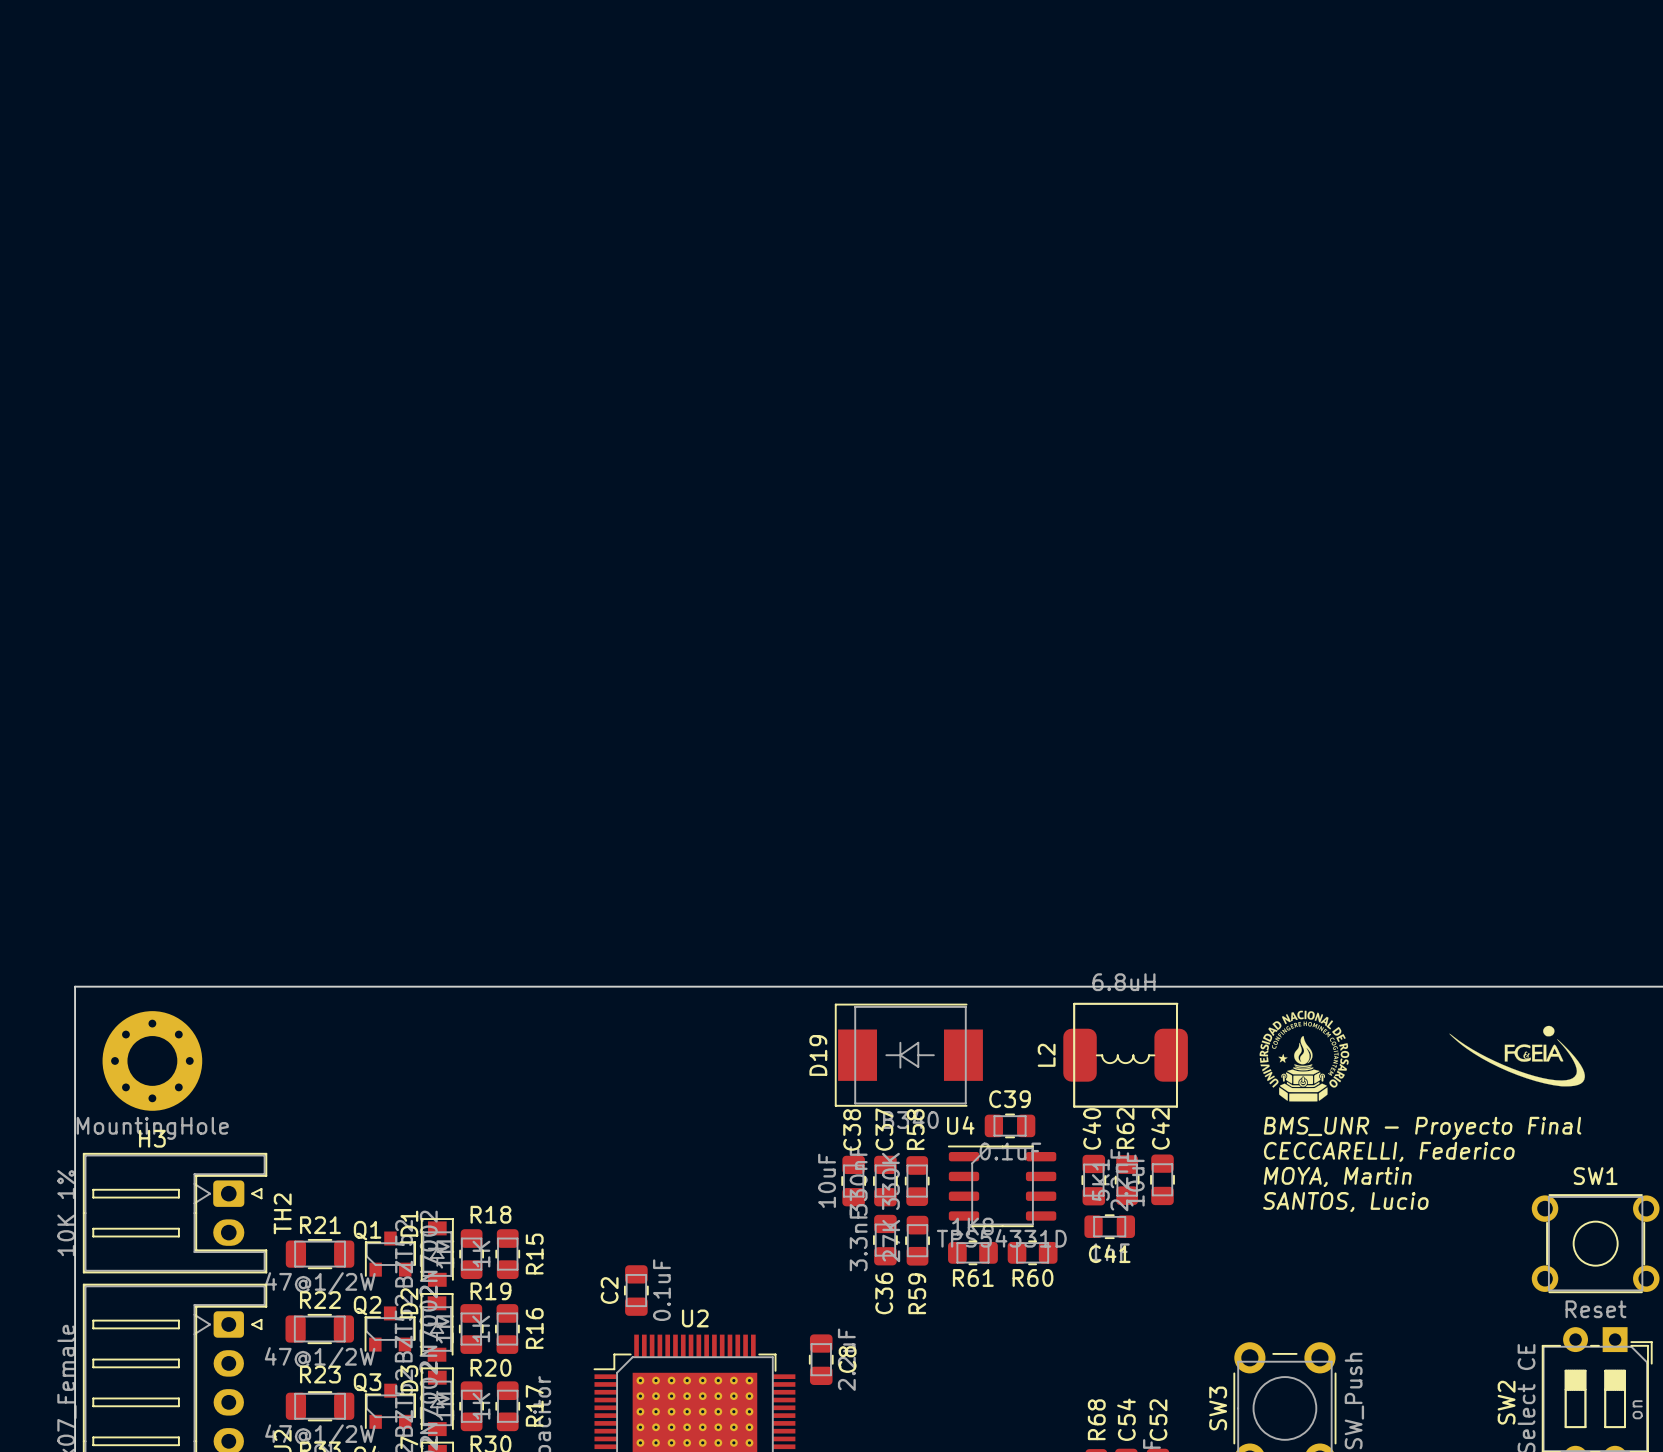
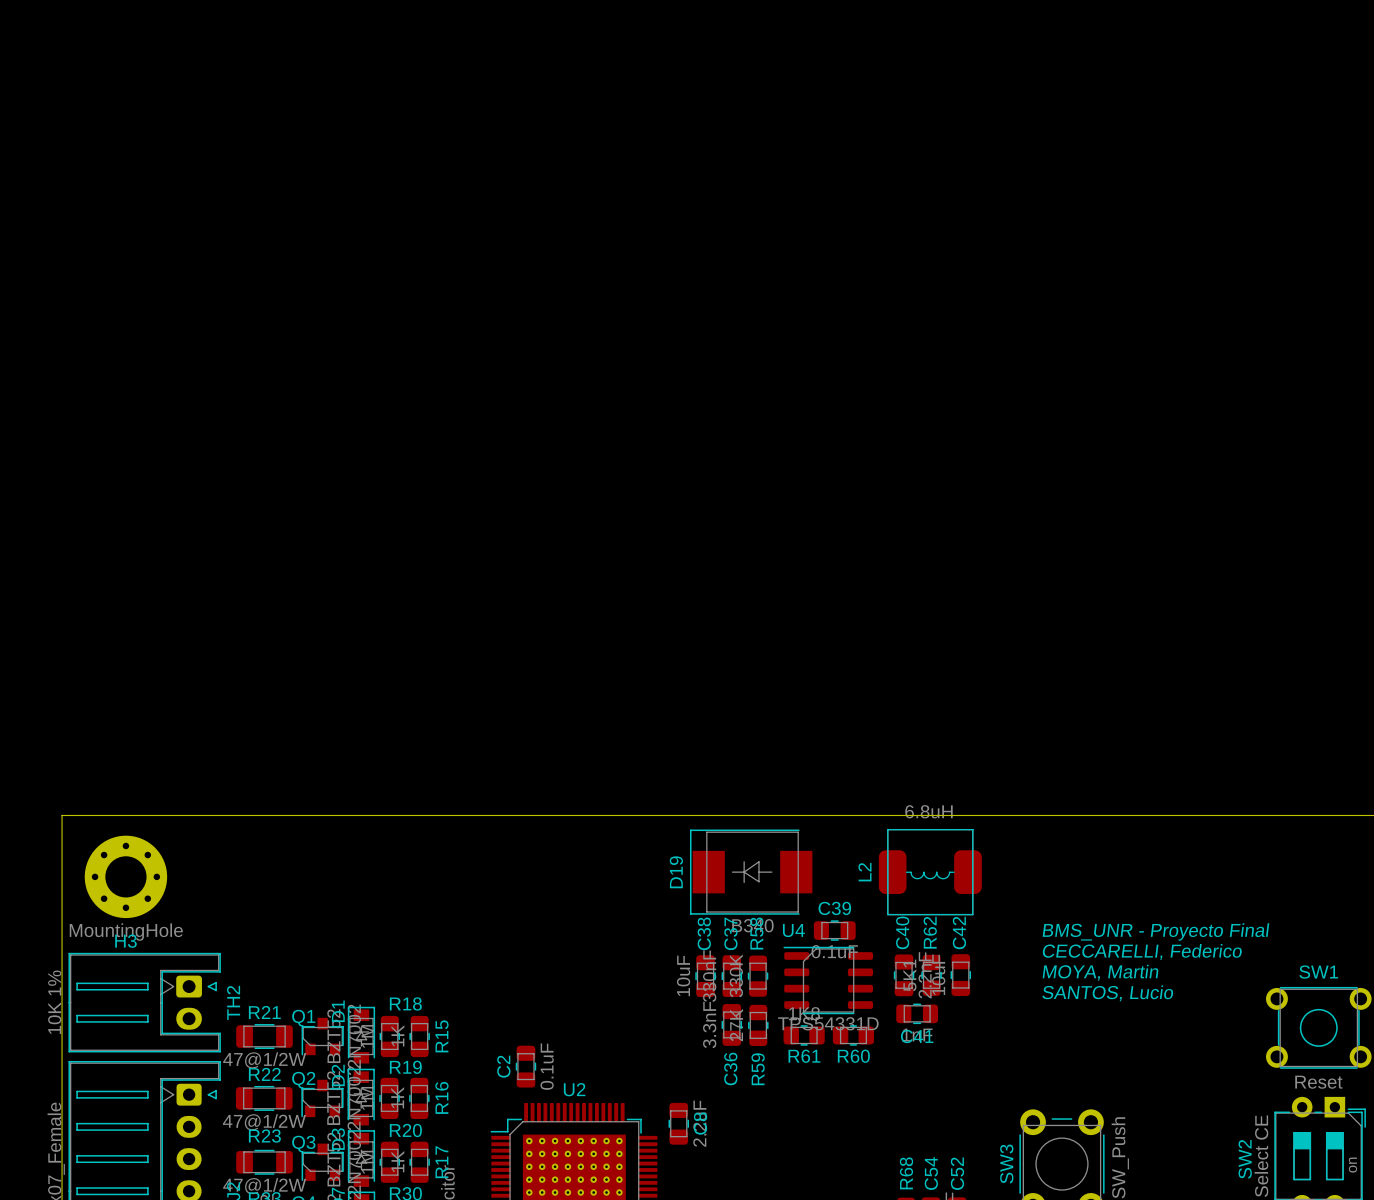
drawing: [1259, 1010, 1350, 1102] -> none
drawing: [1449, 1025, 1585, 1087] -> none

